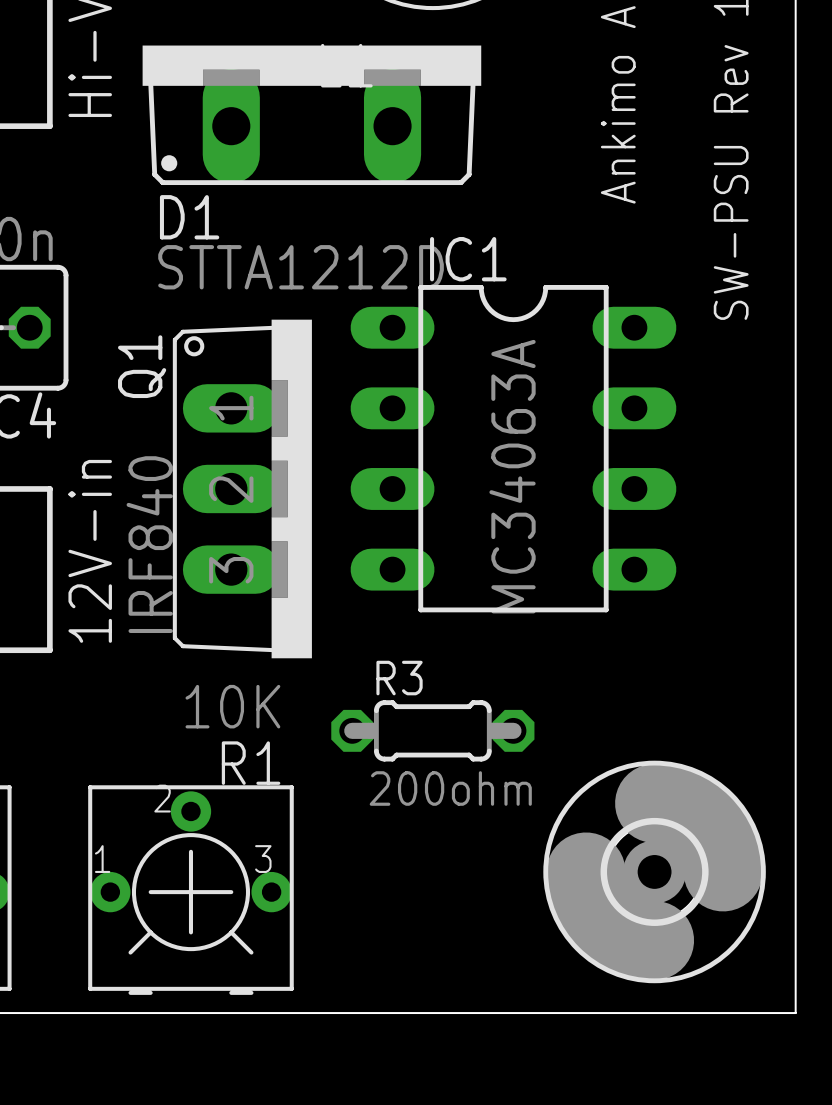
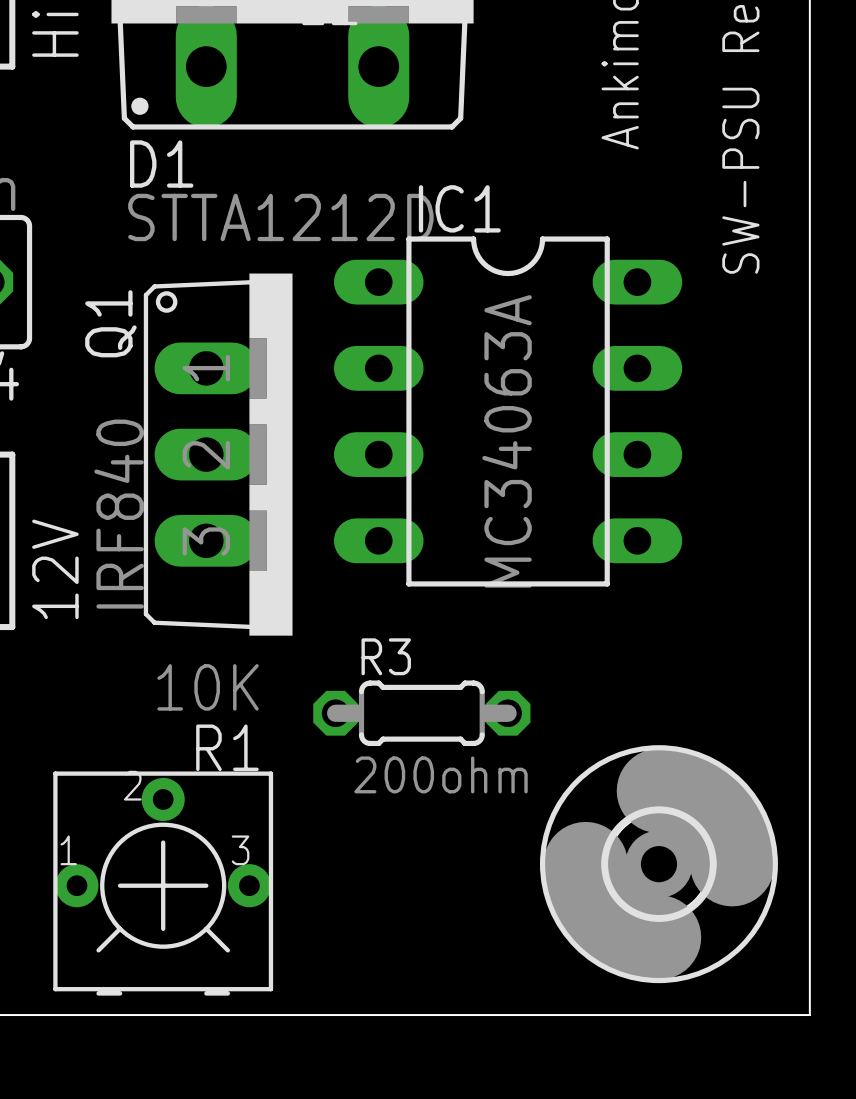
part value: 12V-in (90, 551) -> 12V (55, 569)

